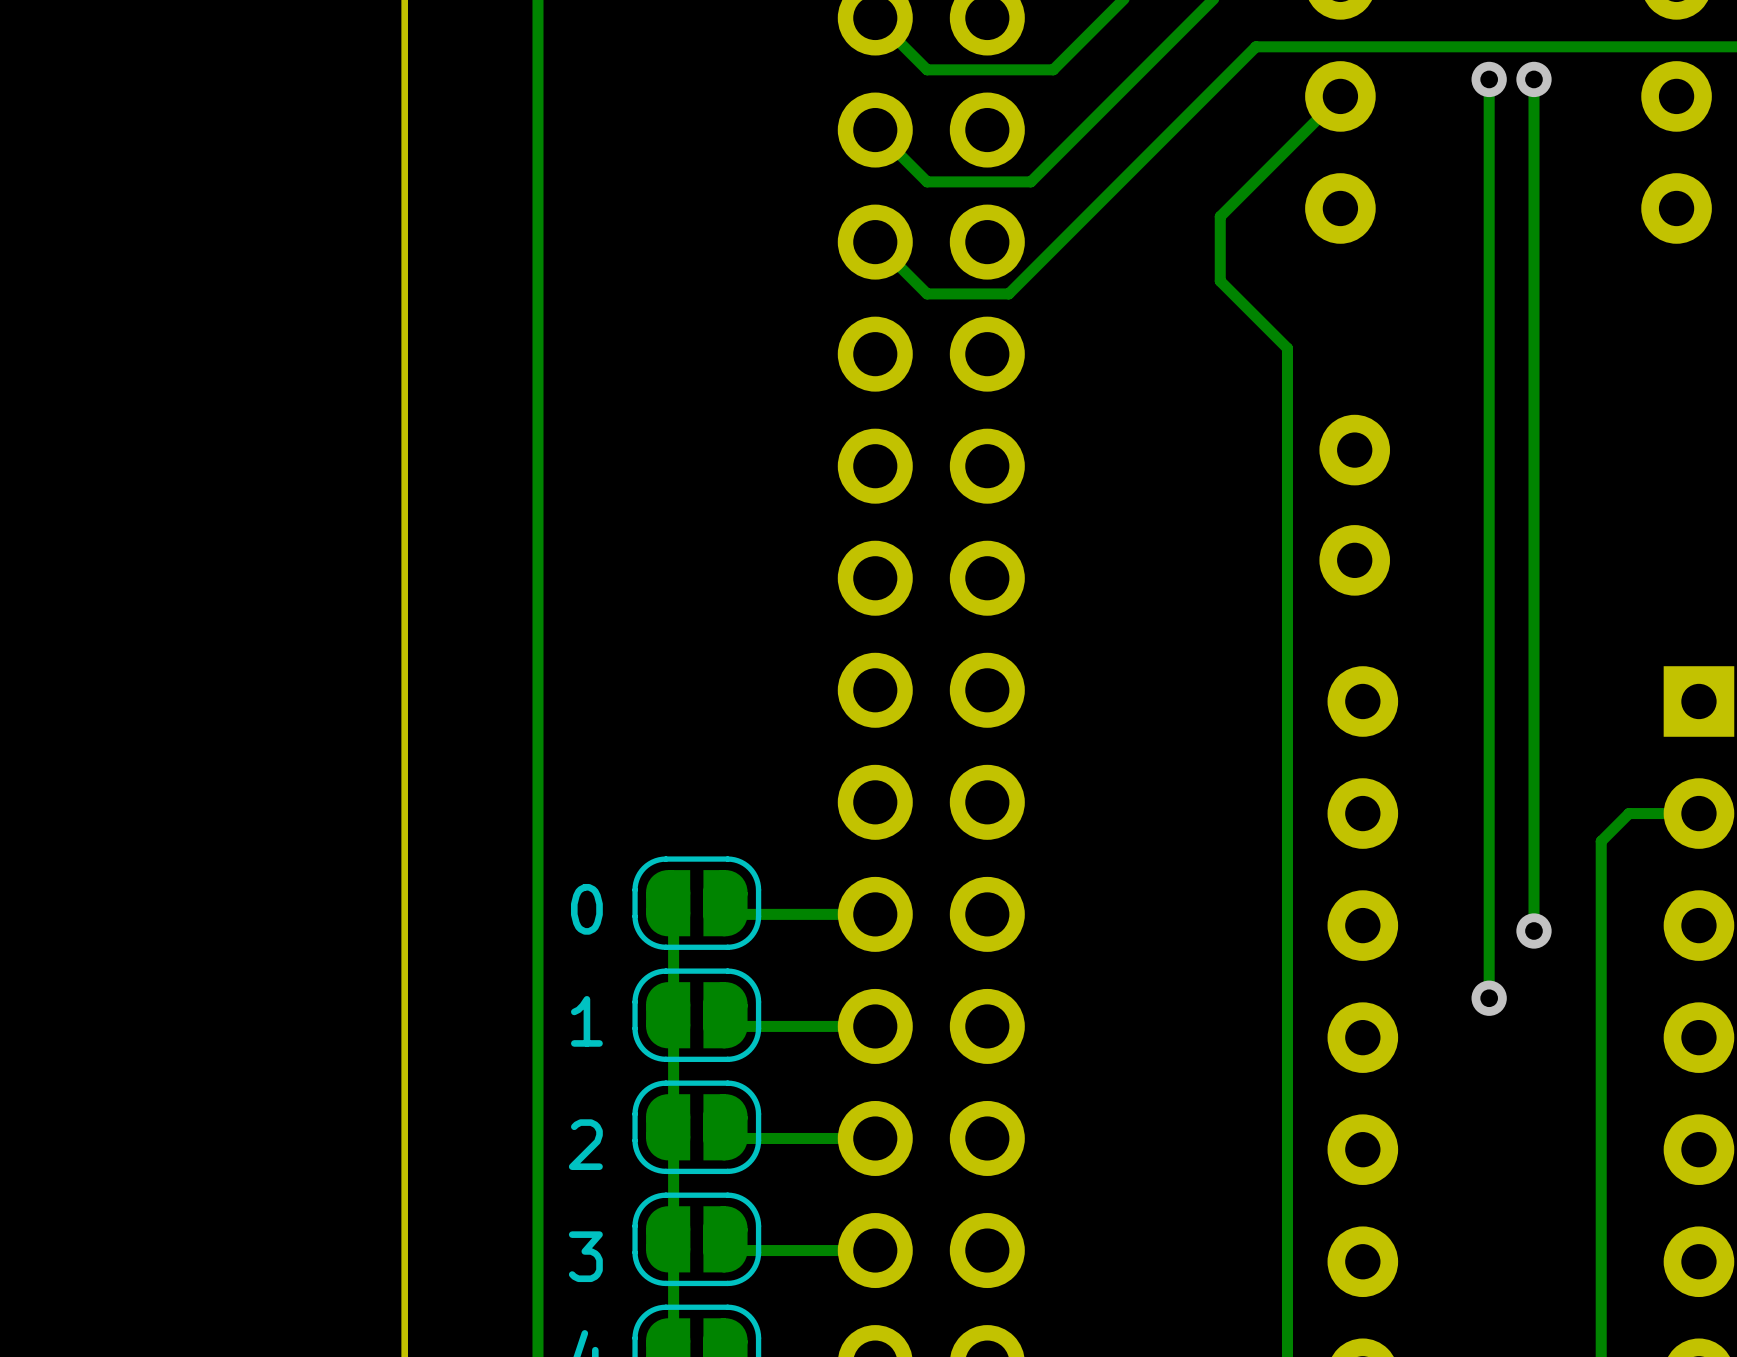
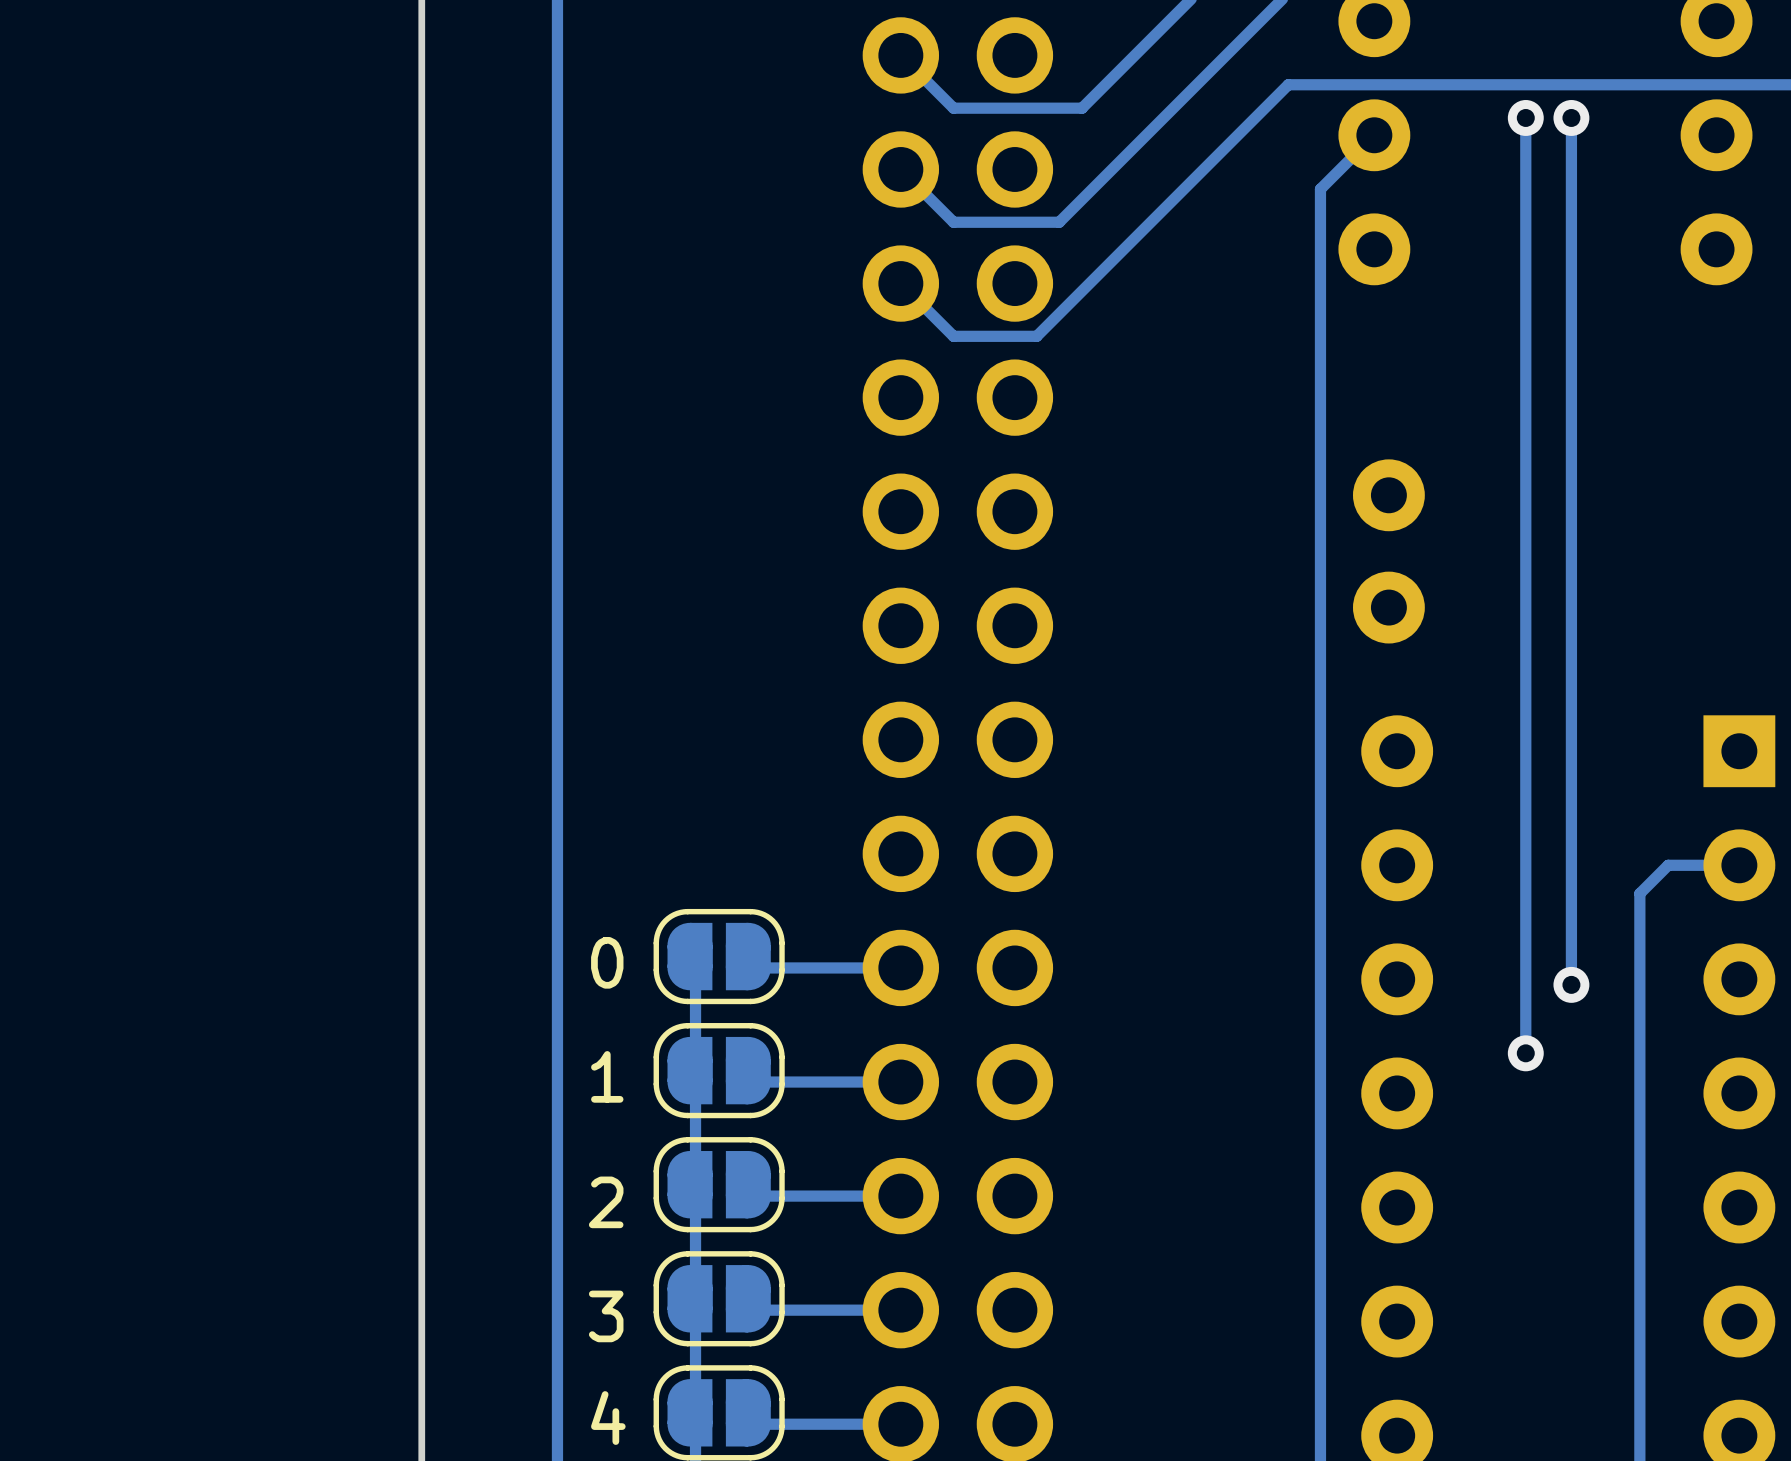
track: (1287, 149) (1220, 216) (1220, 281) (1287, 348) -> (1320, 189) (1320, 391)

